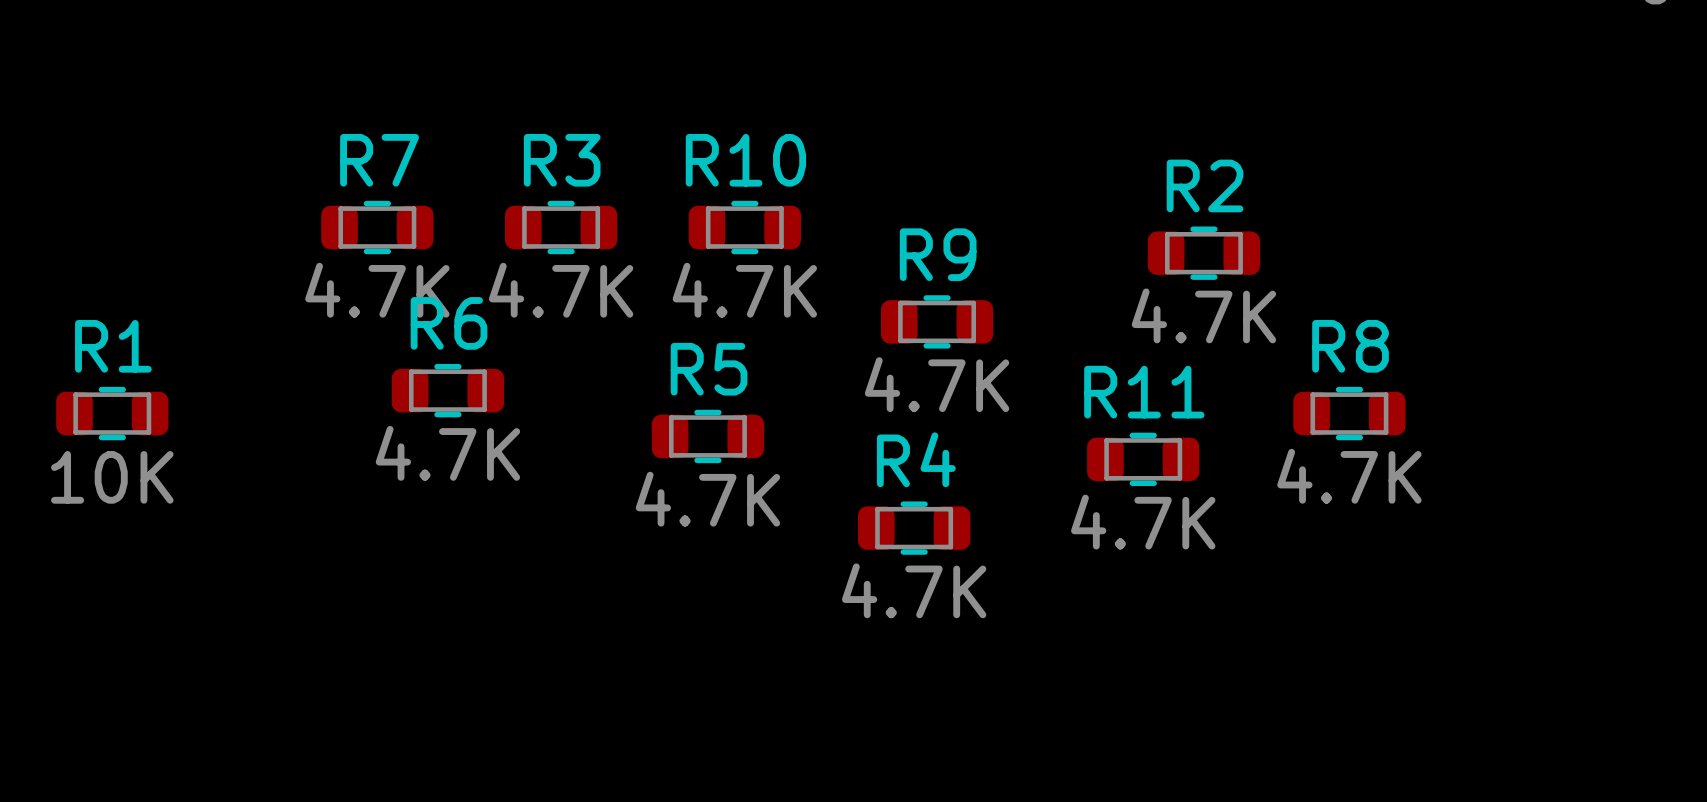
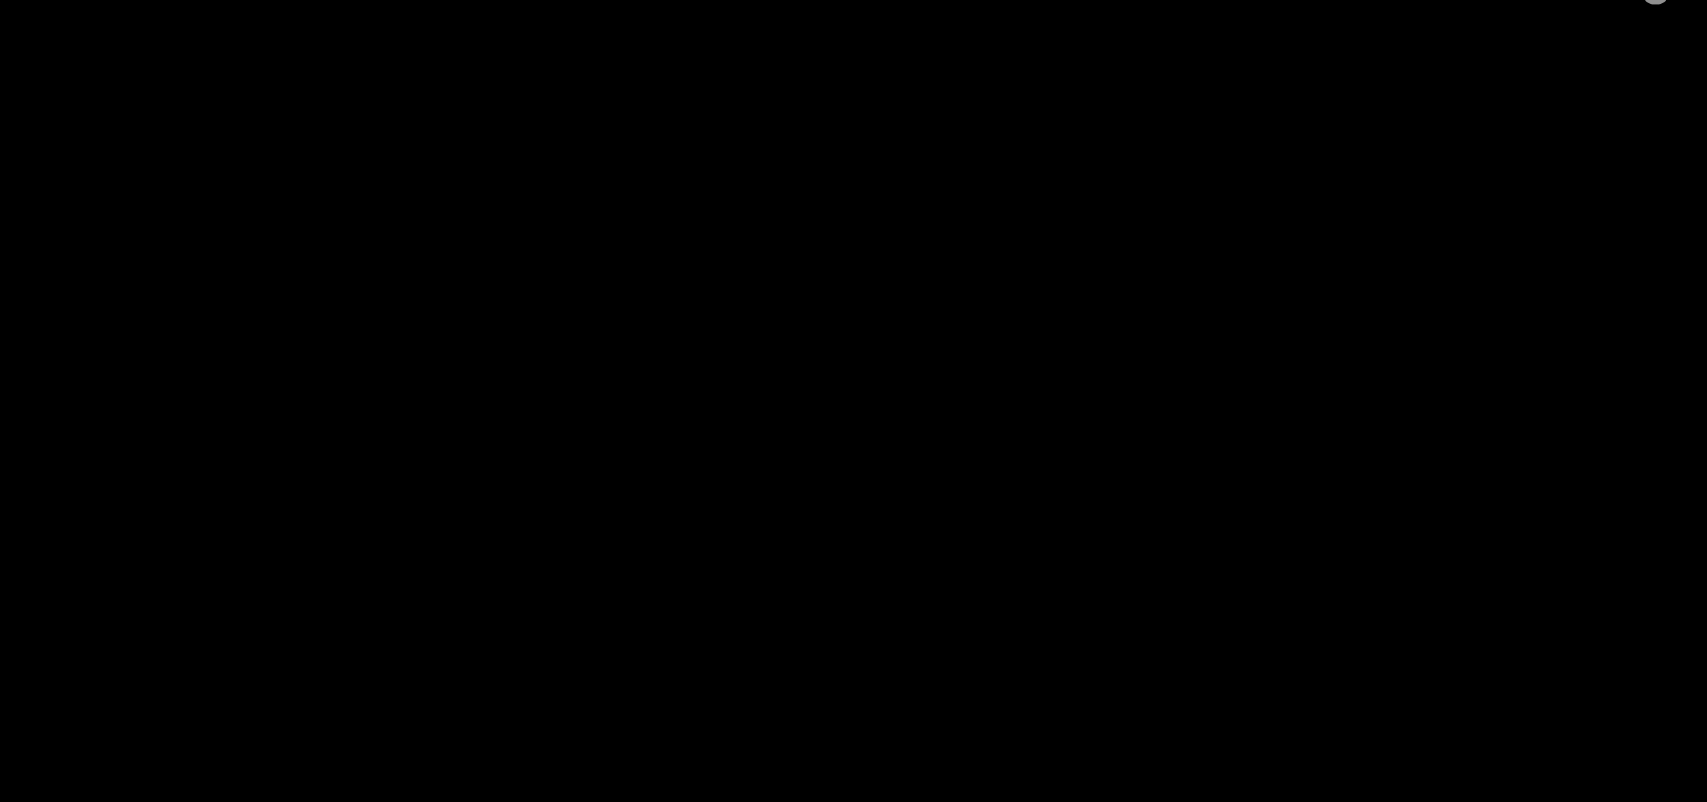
R7: 4.7K (377, 227) -> none
R3: 4.7K (561, 227) -> none
R10: 4.7K (744, 227) -> none
R2: 4.7K (1203, 253) -> none
R9: 4.7K (937, 321) -> none
R6: 4.7K (447, 390) -> none
R1: 10K (112, 413) -> none
R8: 4.7K (1349, 413) -> none
R5: 4.7K (707, 436) -> none
R11: 4.7K (1143, 459) -> none
R4: 4.7K (914, 528) -> none

